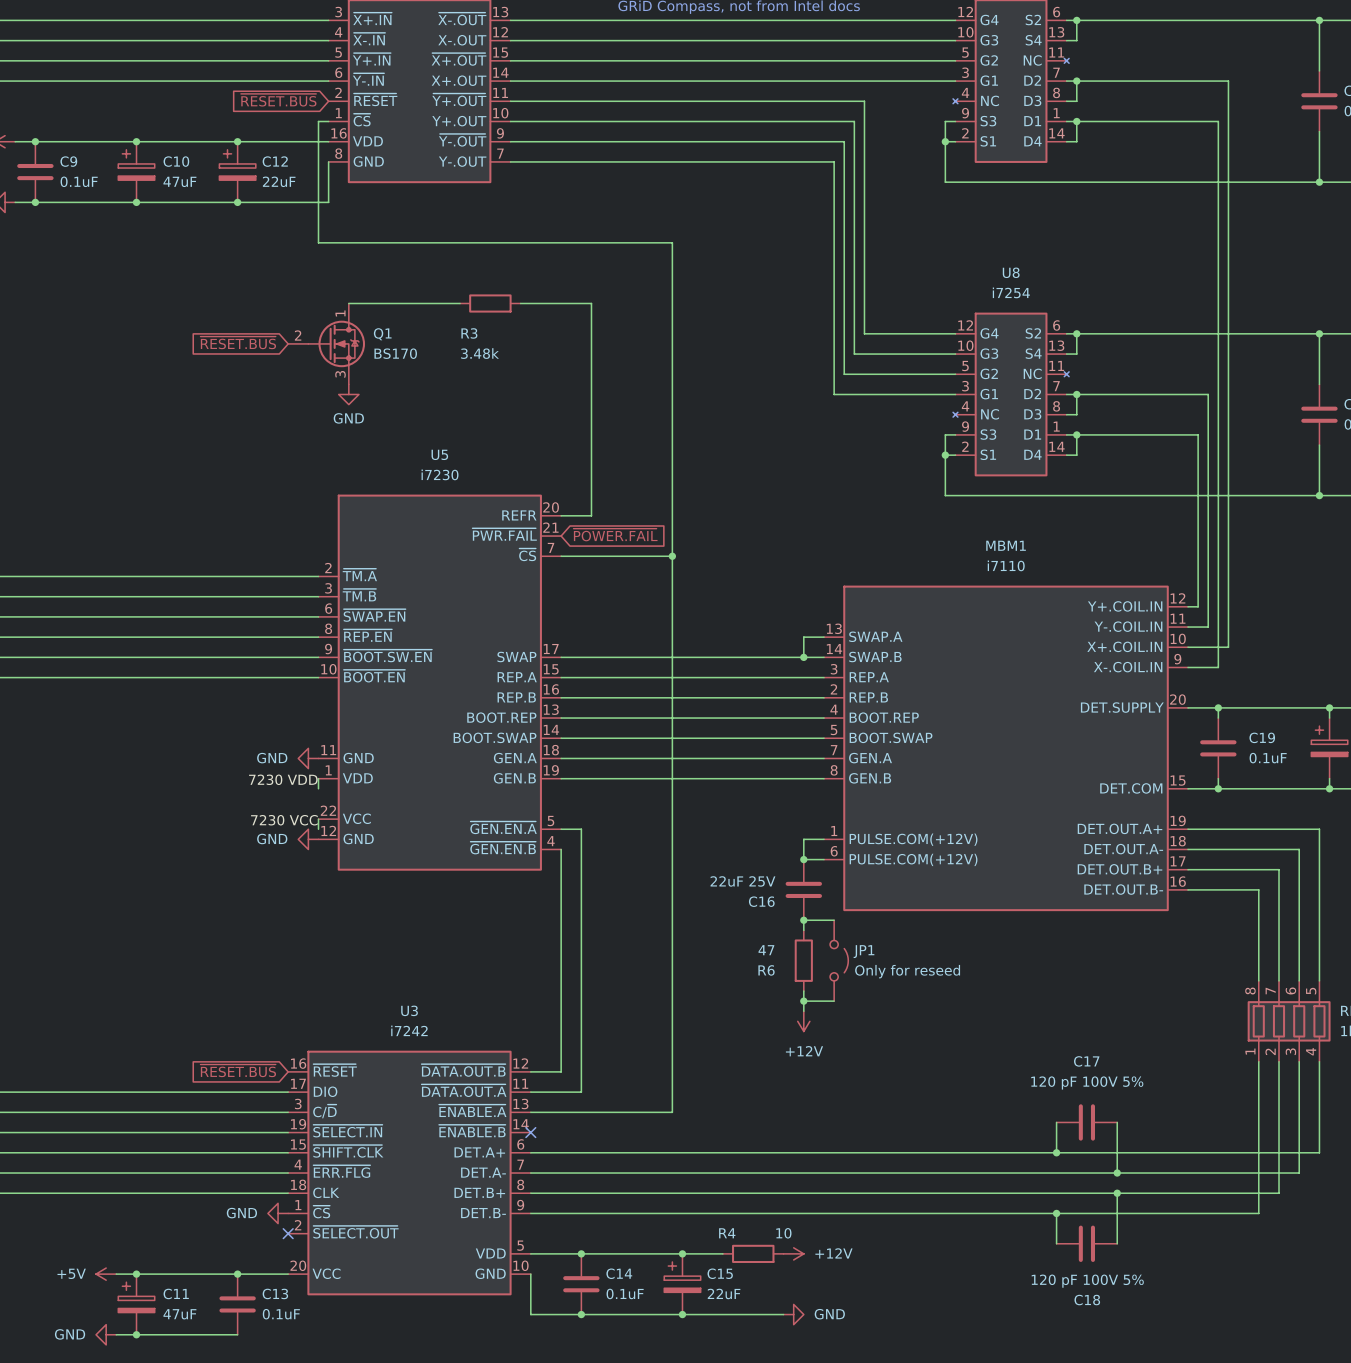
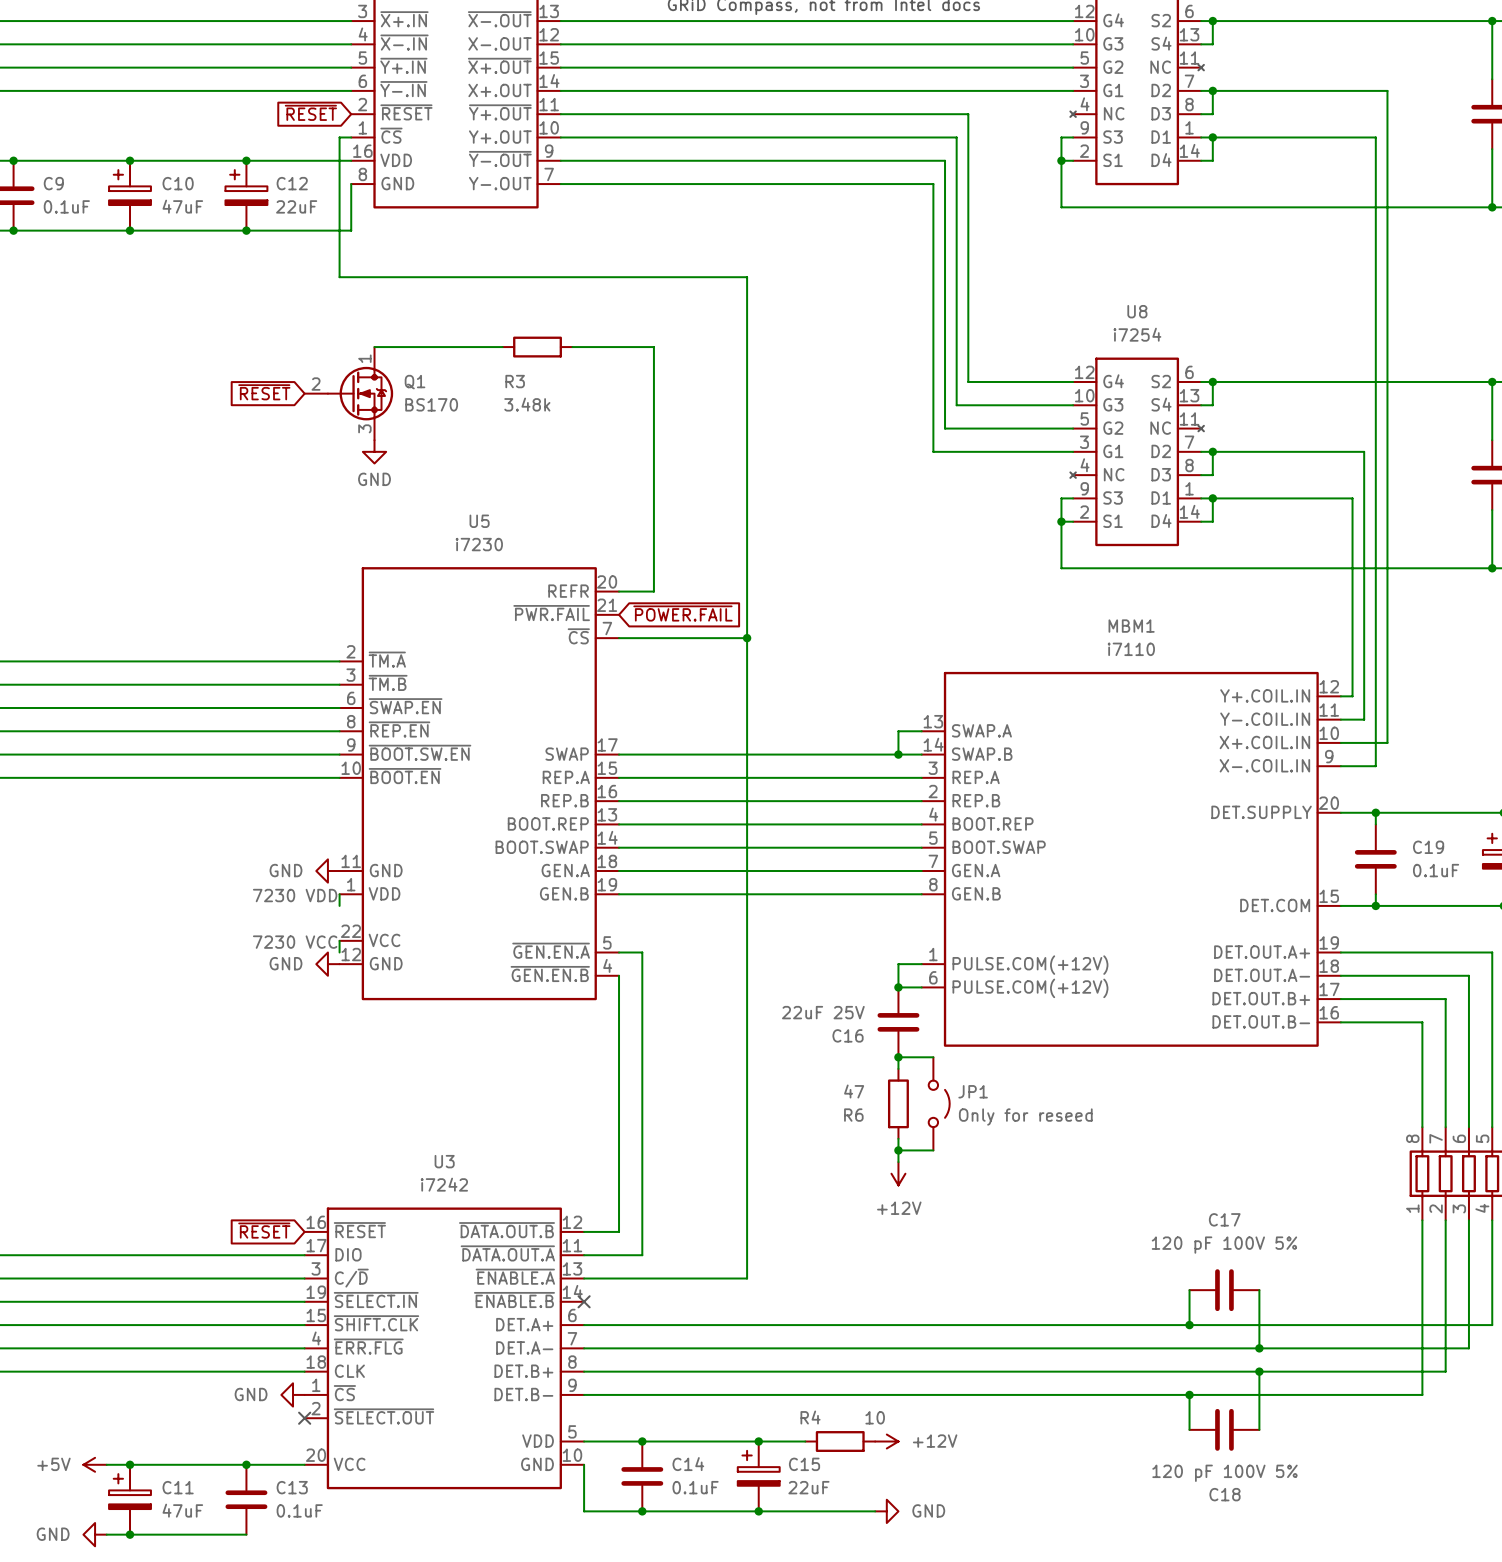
global label: ~{RESET.BUS} (278, 100) -> ~{RESET} (310, 112)
global label: ~{RESET.BUS} (238, 342) -> ~{RESET} (264, 392)
global label: ~{RESET.BUS} (238, 1070) -> ~{RESET} (264, 1230)

